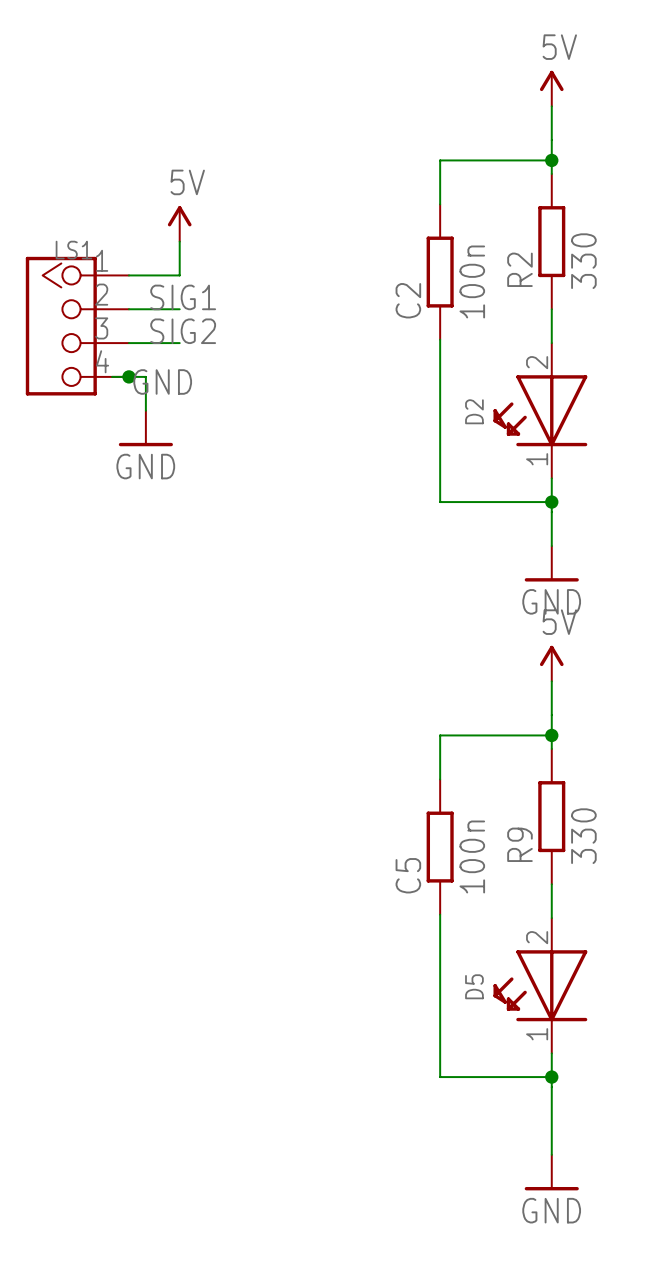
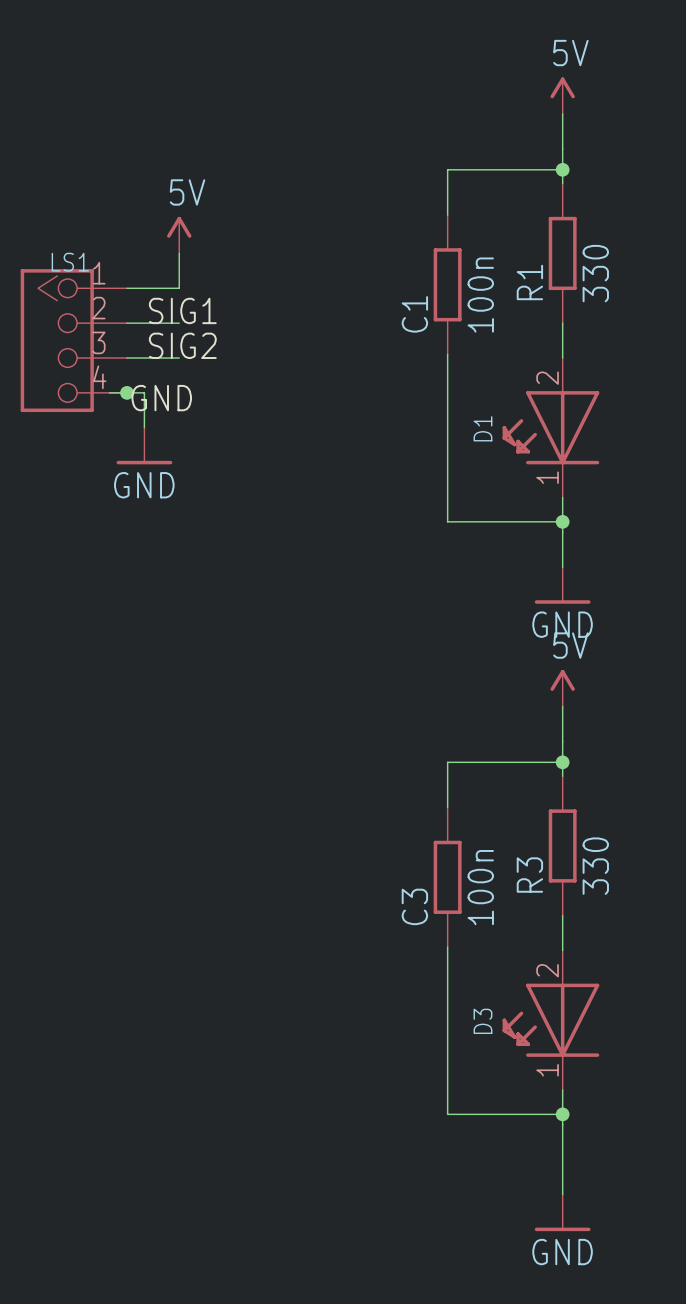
R2 name: R2 (519, 269) -> R1 (529, 282)
C2 name: C2 (408, 300) -> C1 (414, 314)
D2 name: D2 (474, 411) -> D1 (482, 428)
R9 name: R9 (519, 844) -> R3 (529, 875)
C5 name: C5 (408, 875) -> C3 (414, 906)
D5 name: D5 (474, 986) -> D3 (482, 1021)

